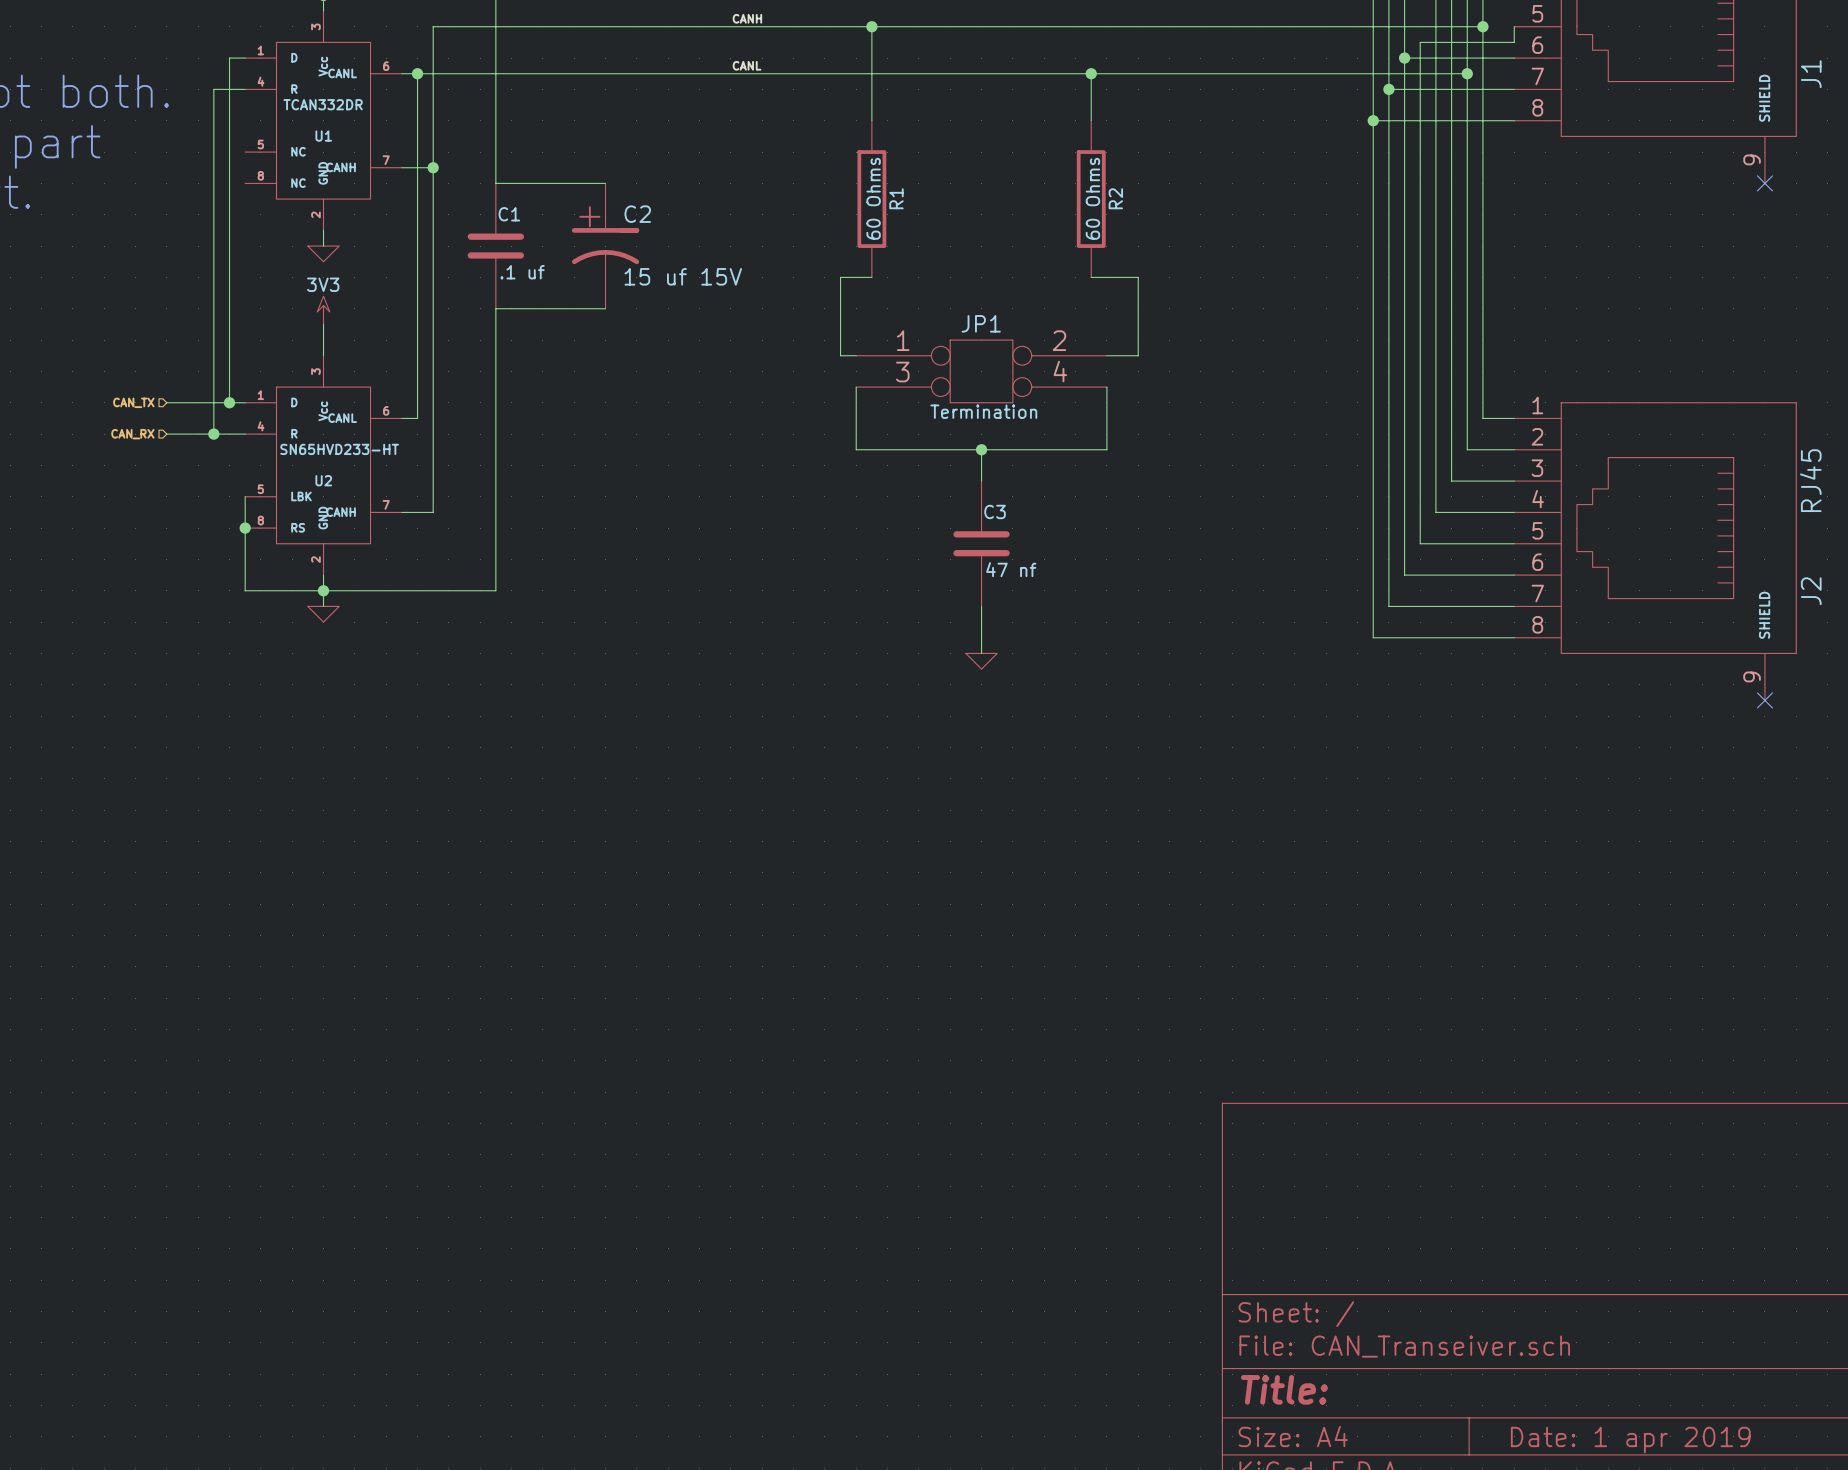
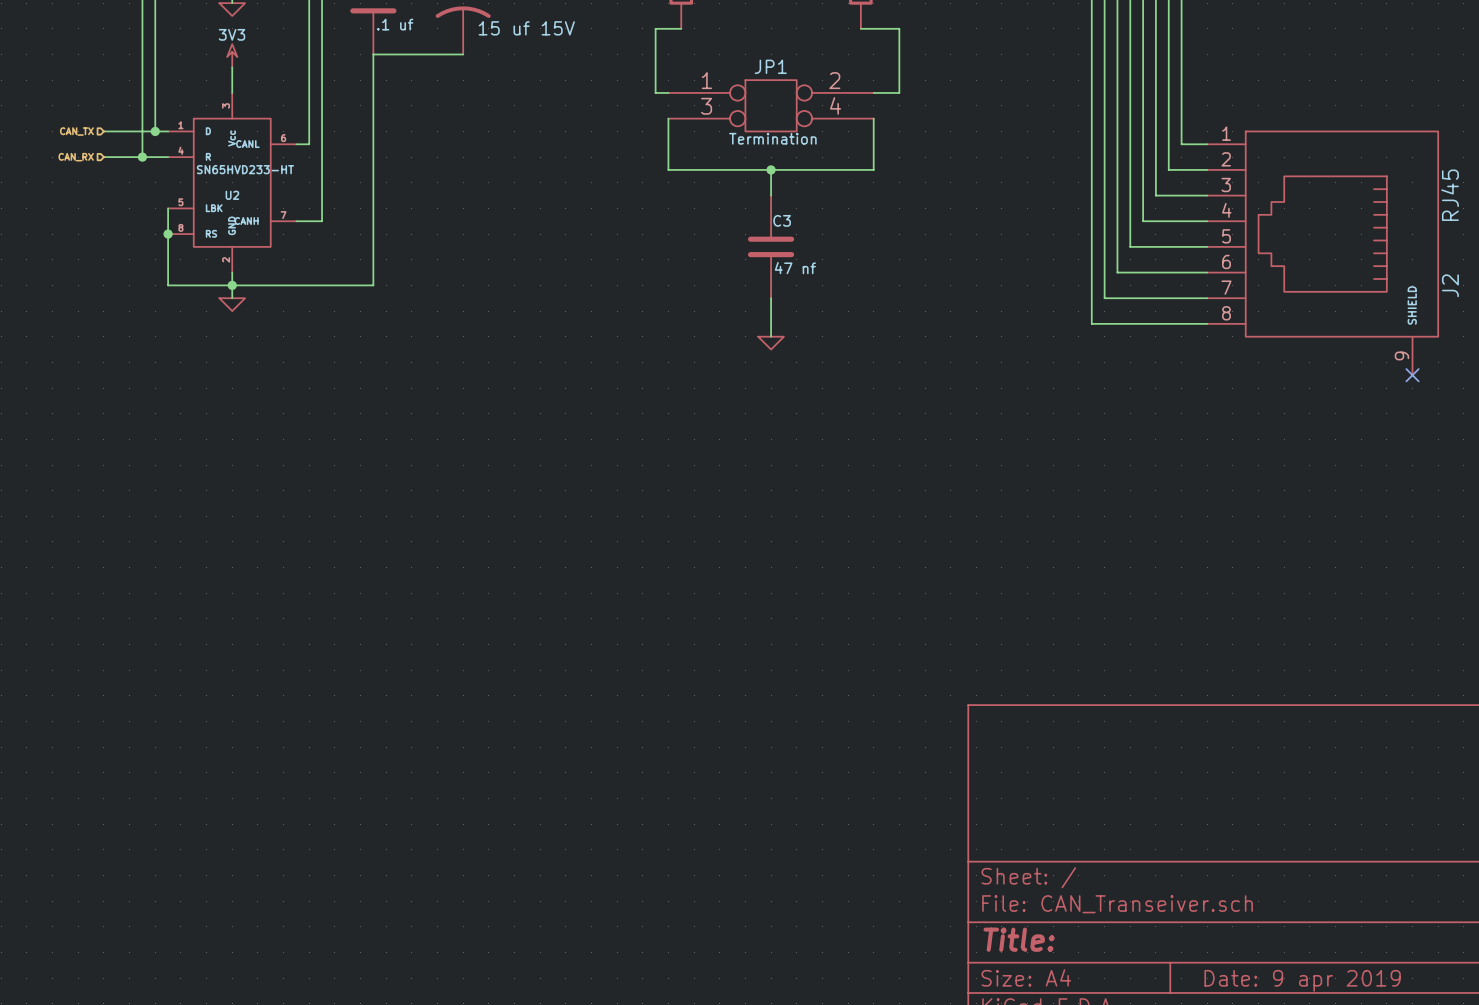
title block: Date: 1 apr 2019 (1630, 1440) -> Date: 9 apr 2019 (1302, 980)

